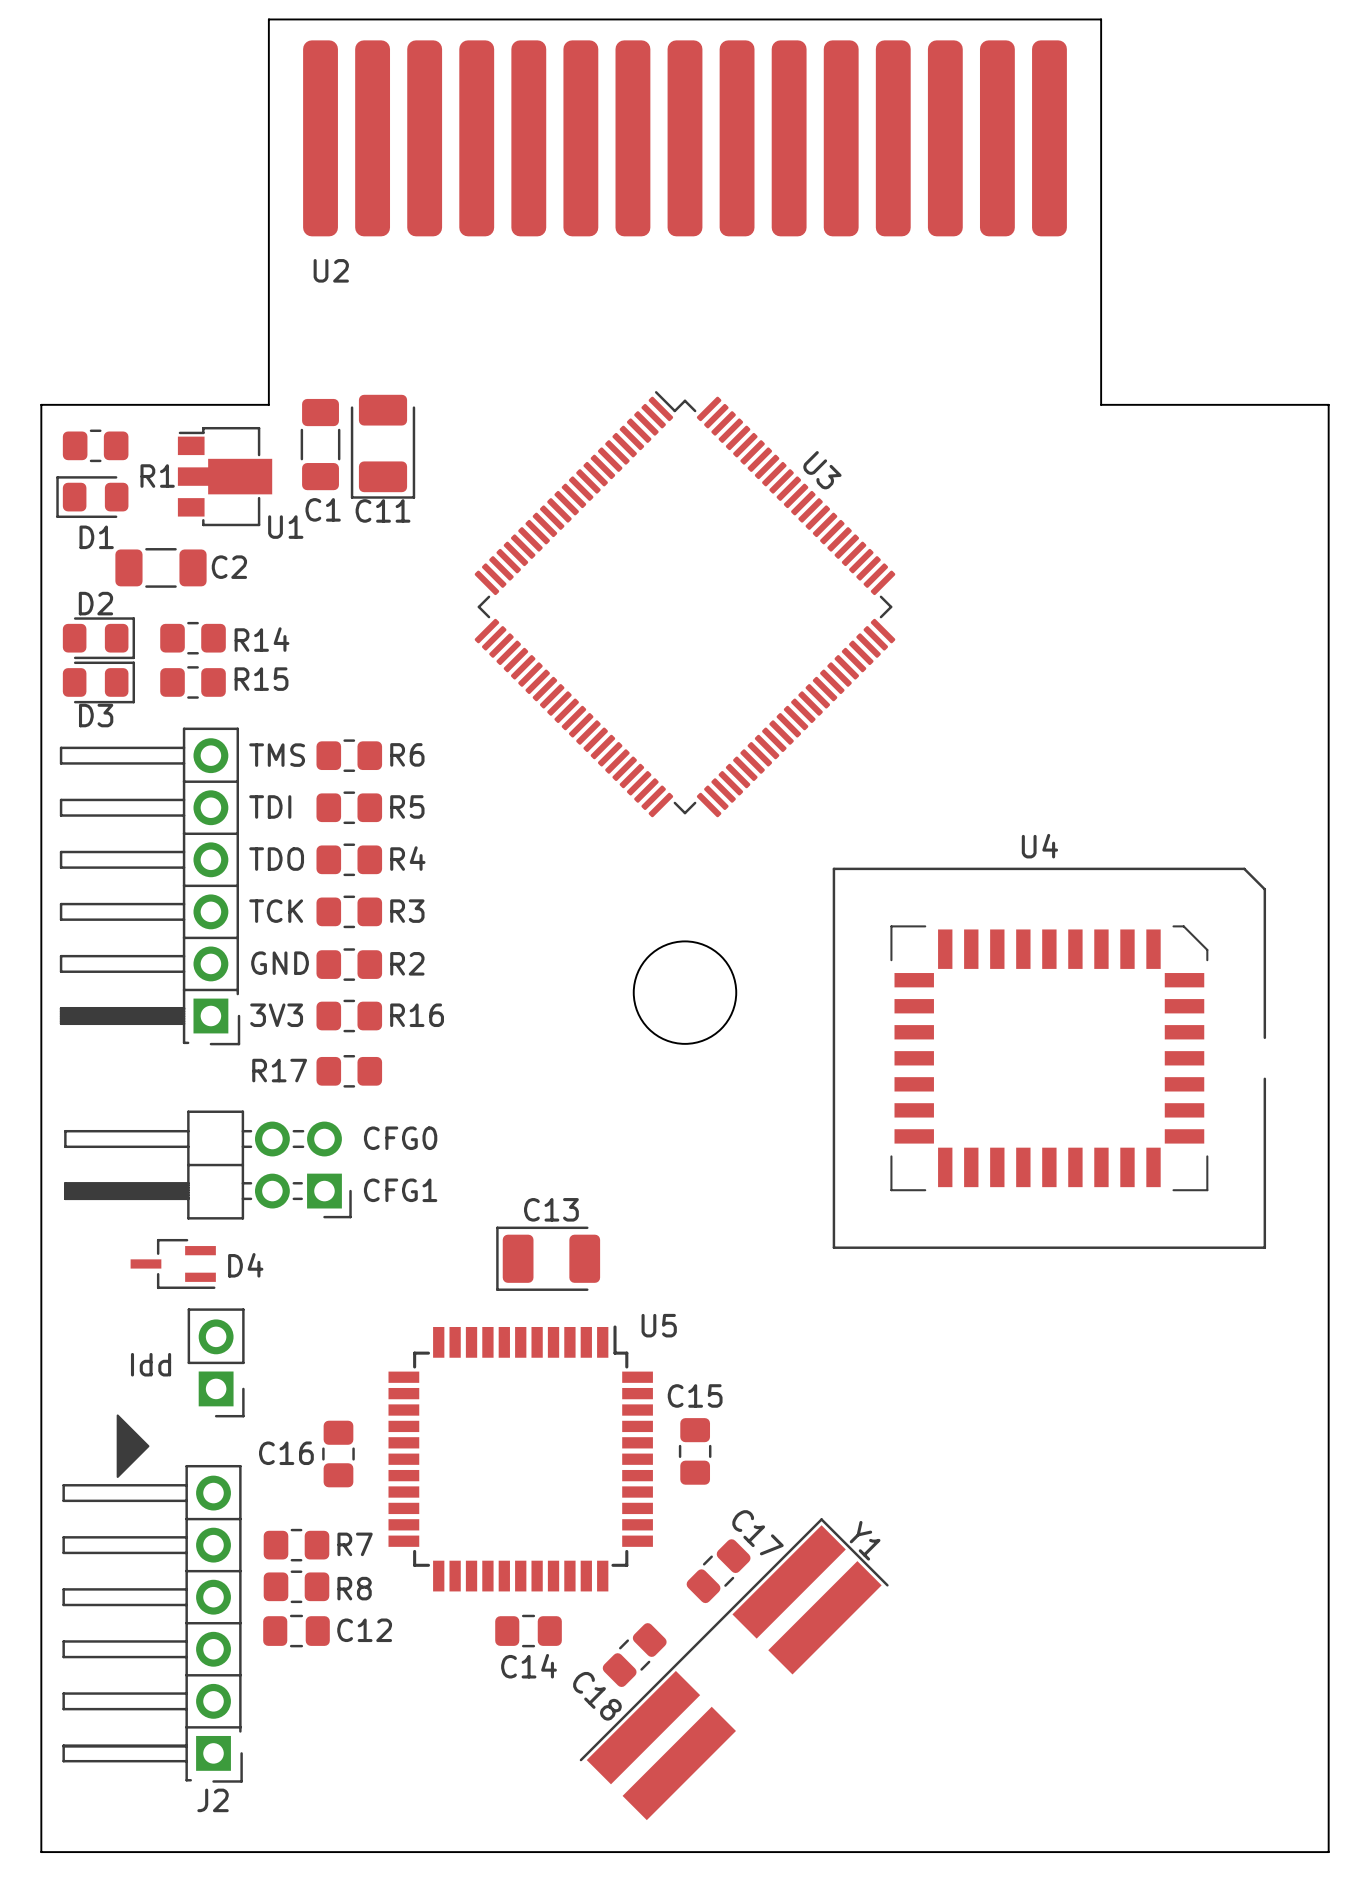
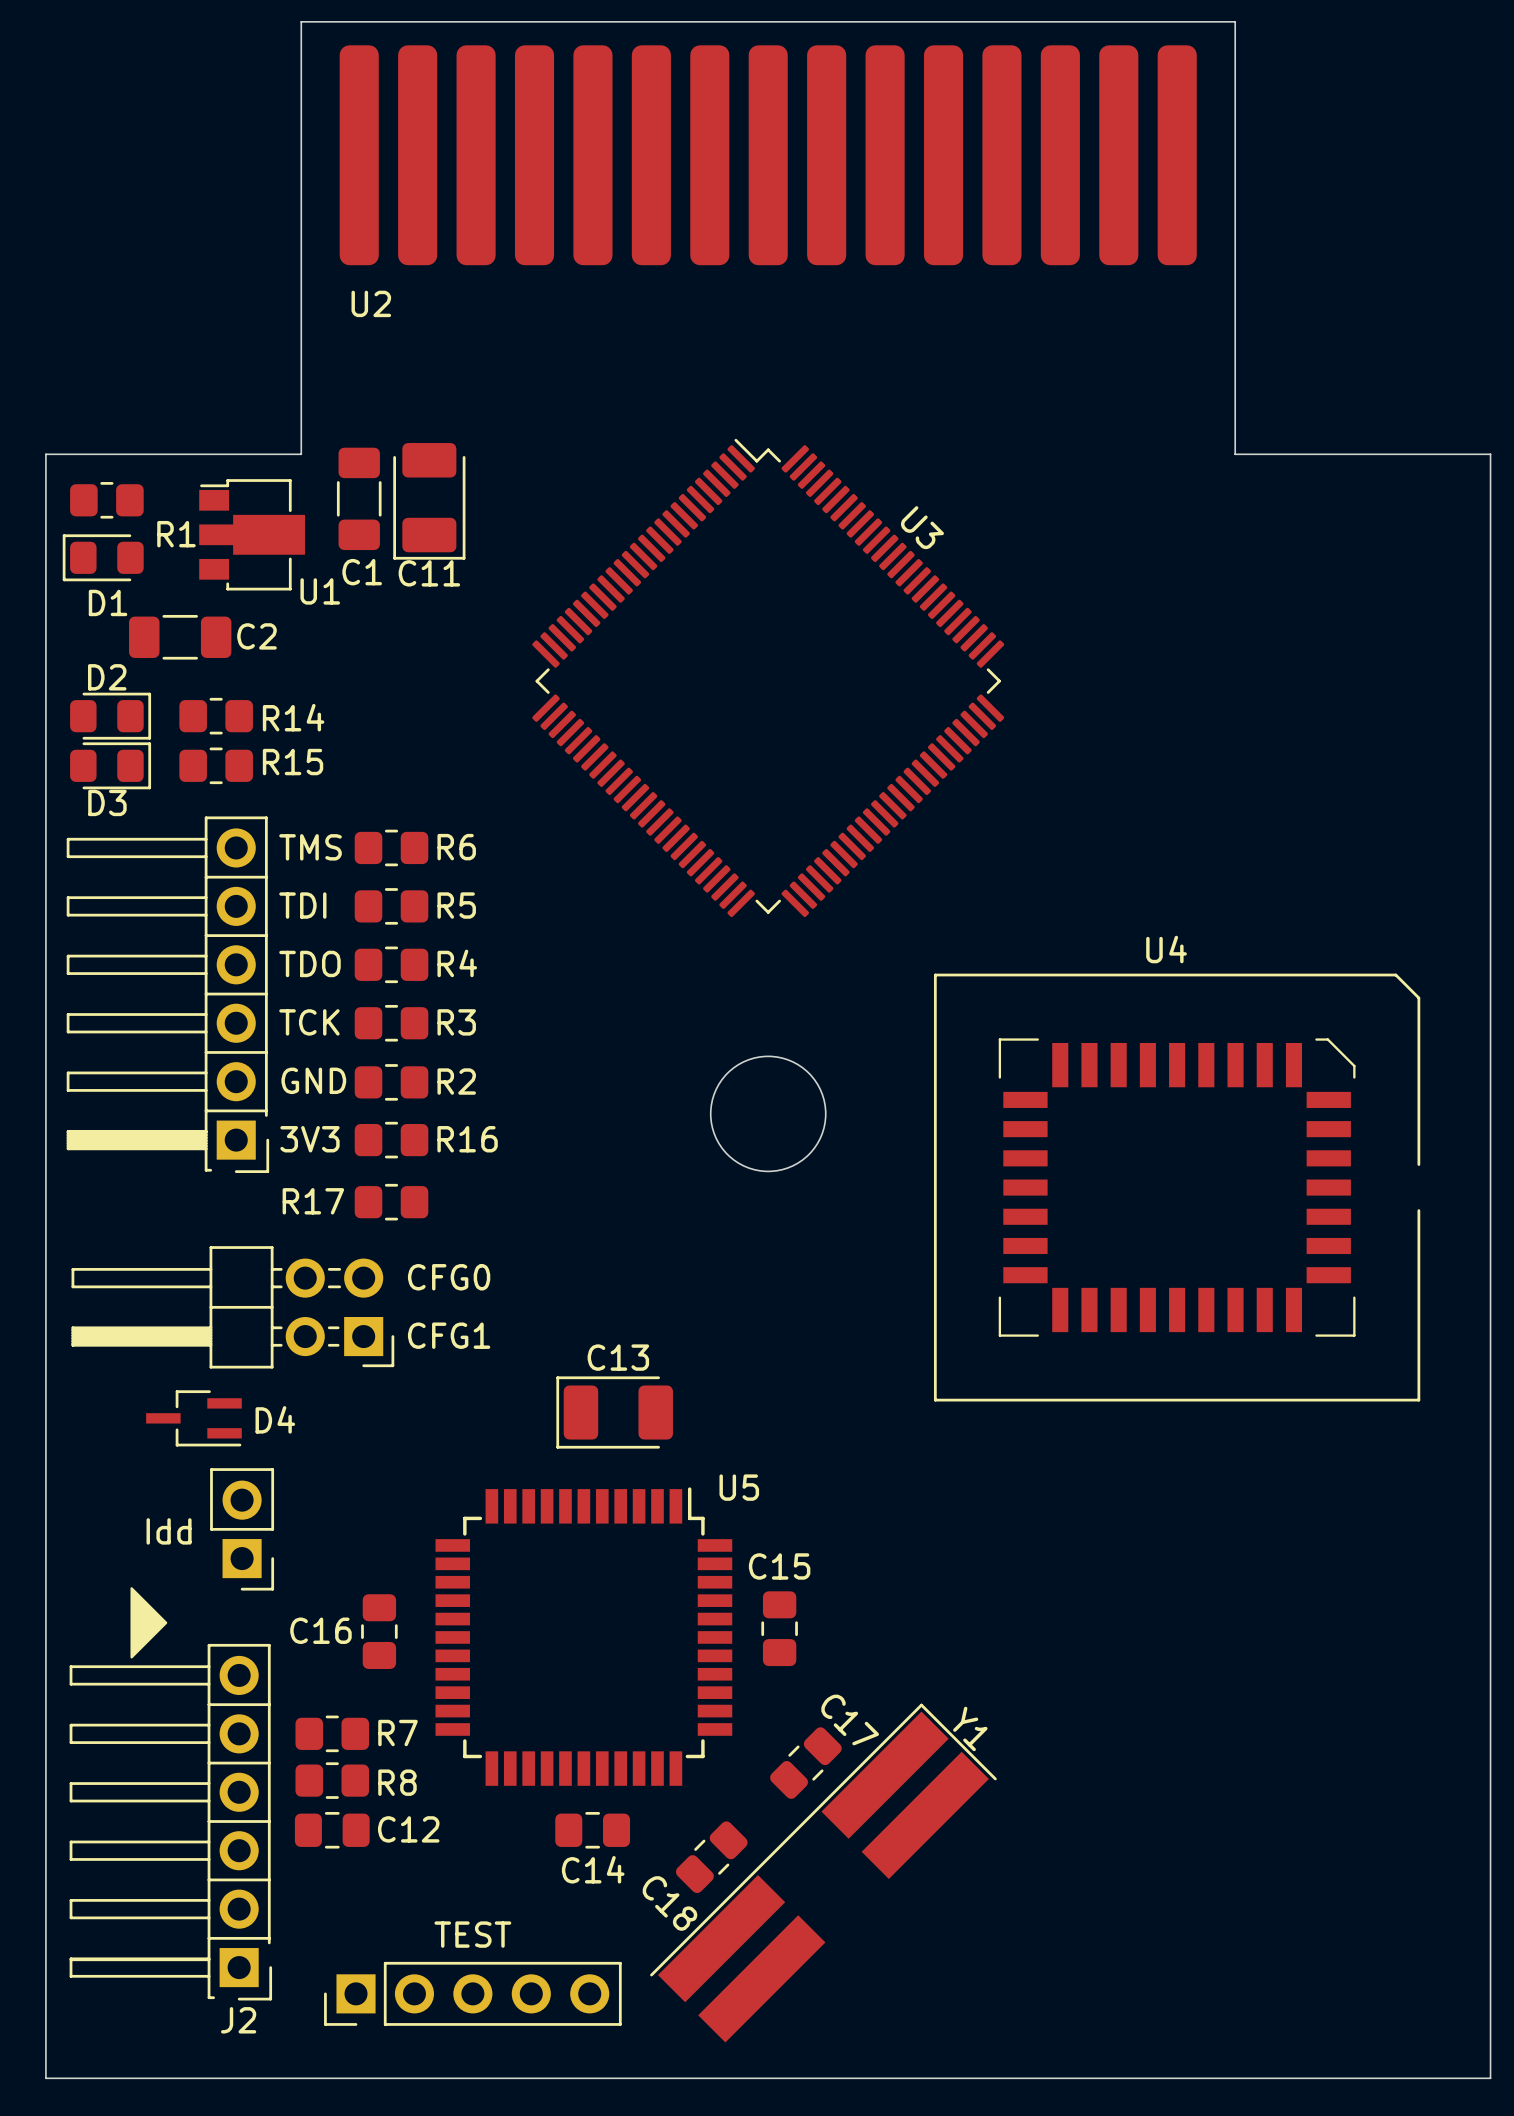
text: none -> TEST (472, 1934)
part: none -> (472, 1993)

